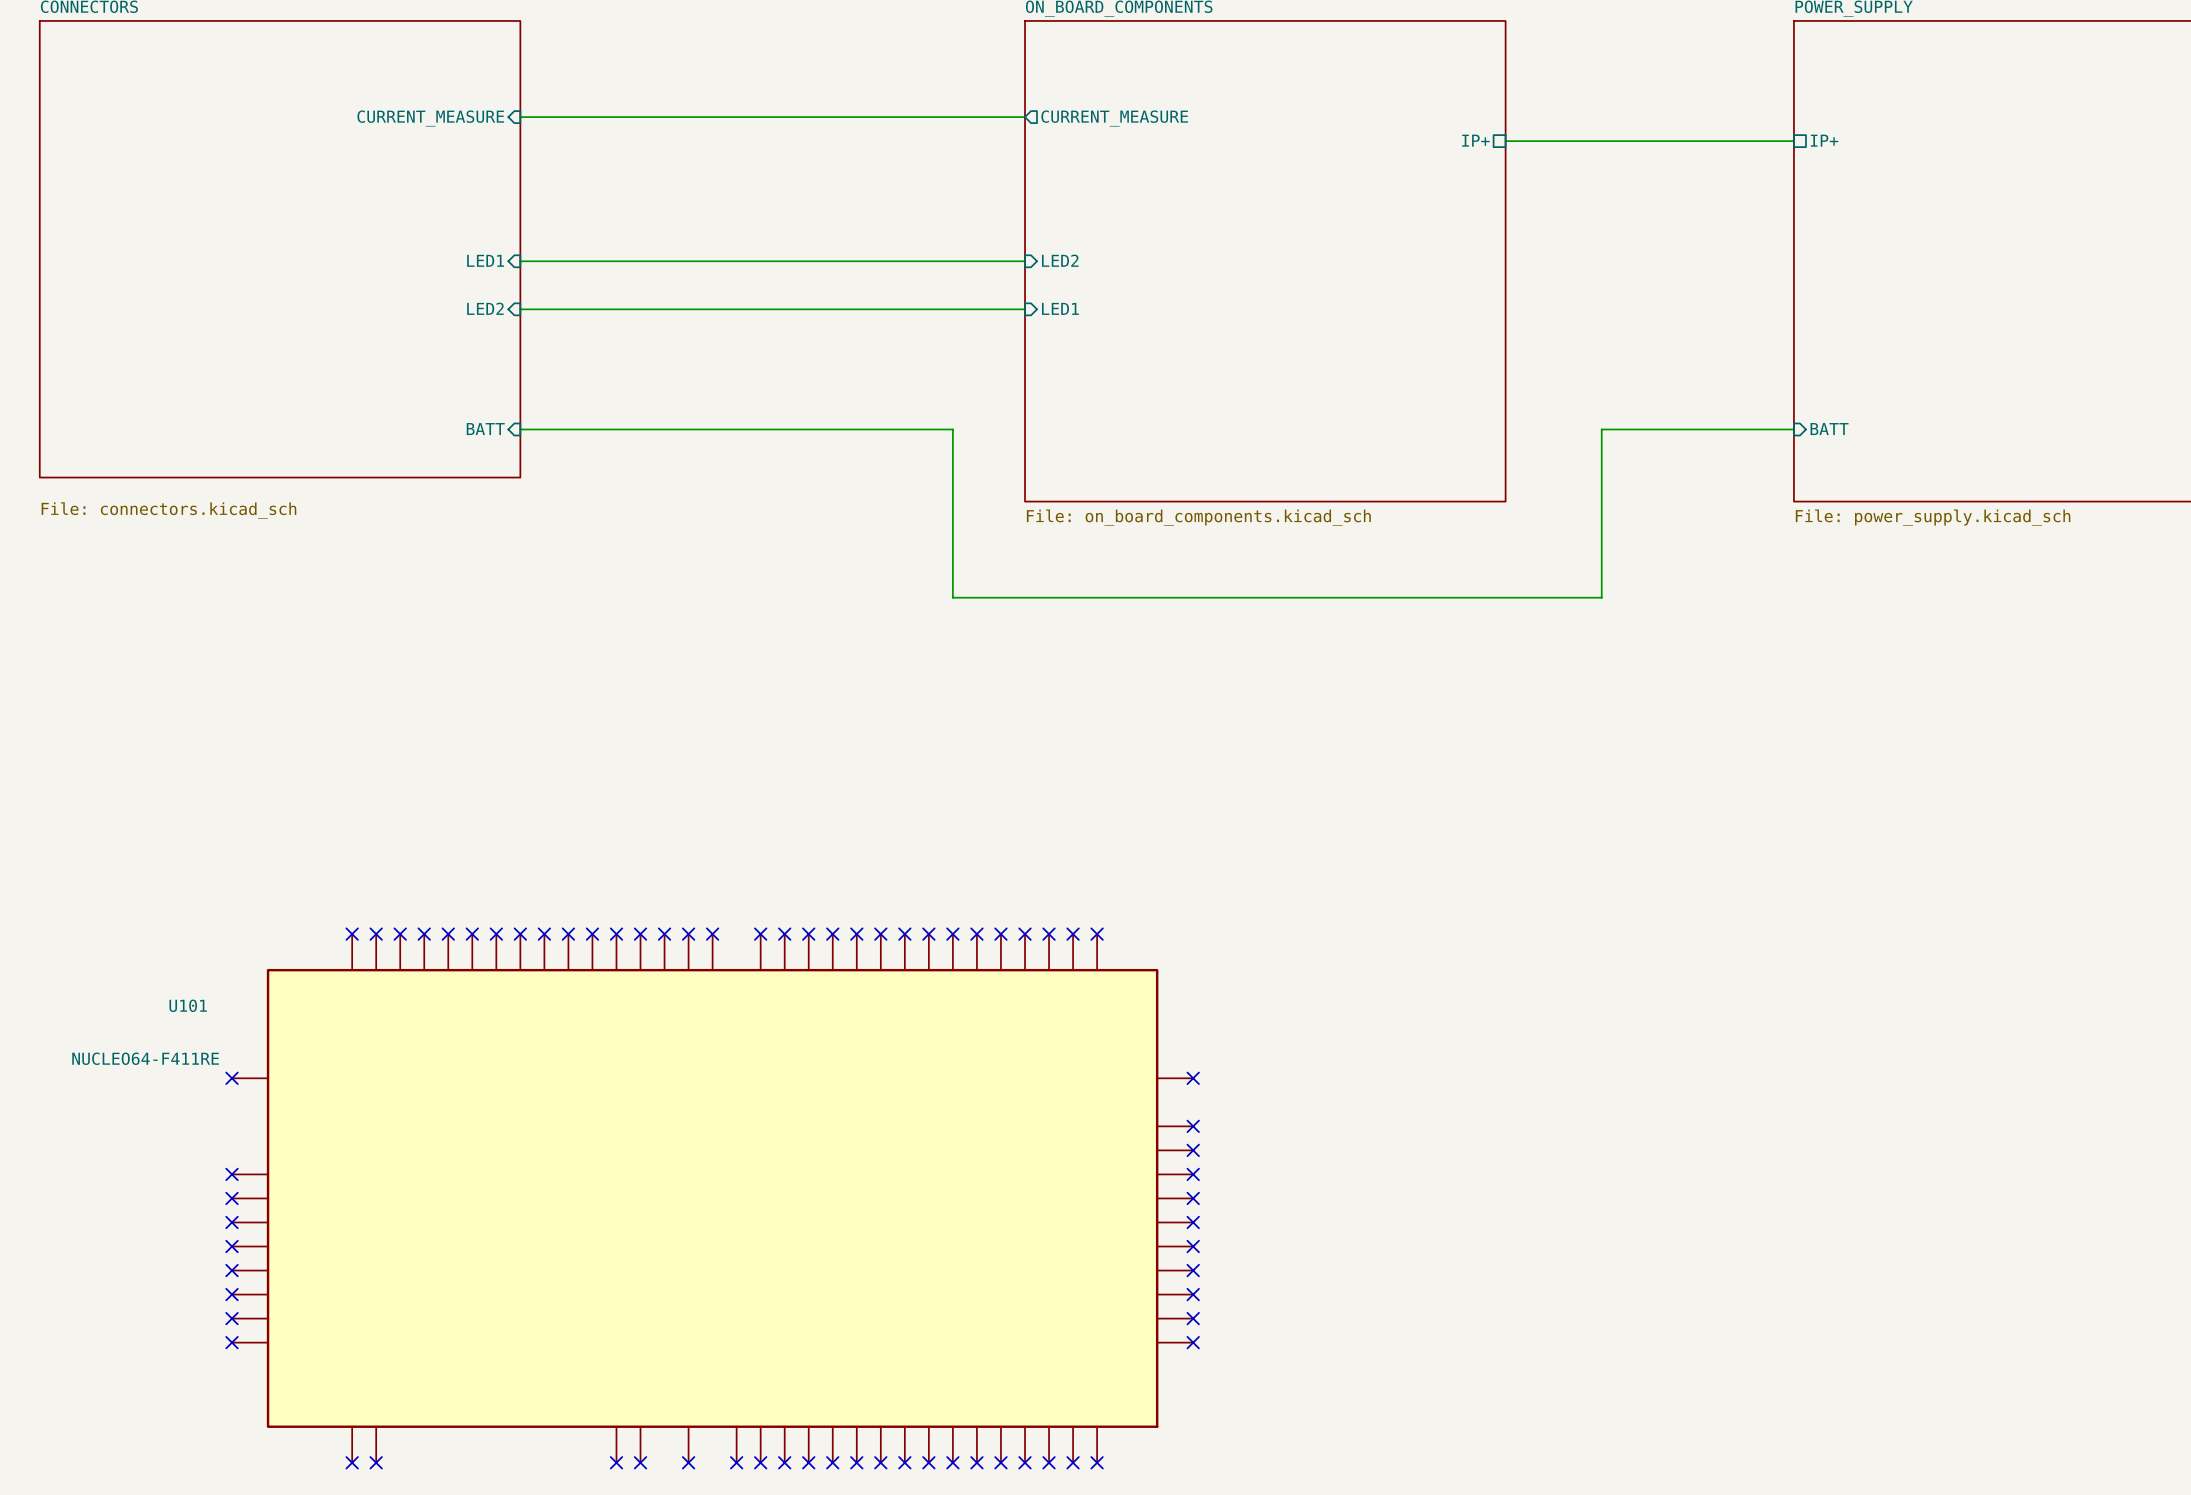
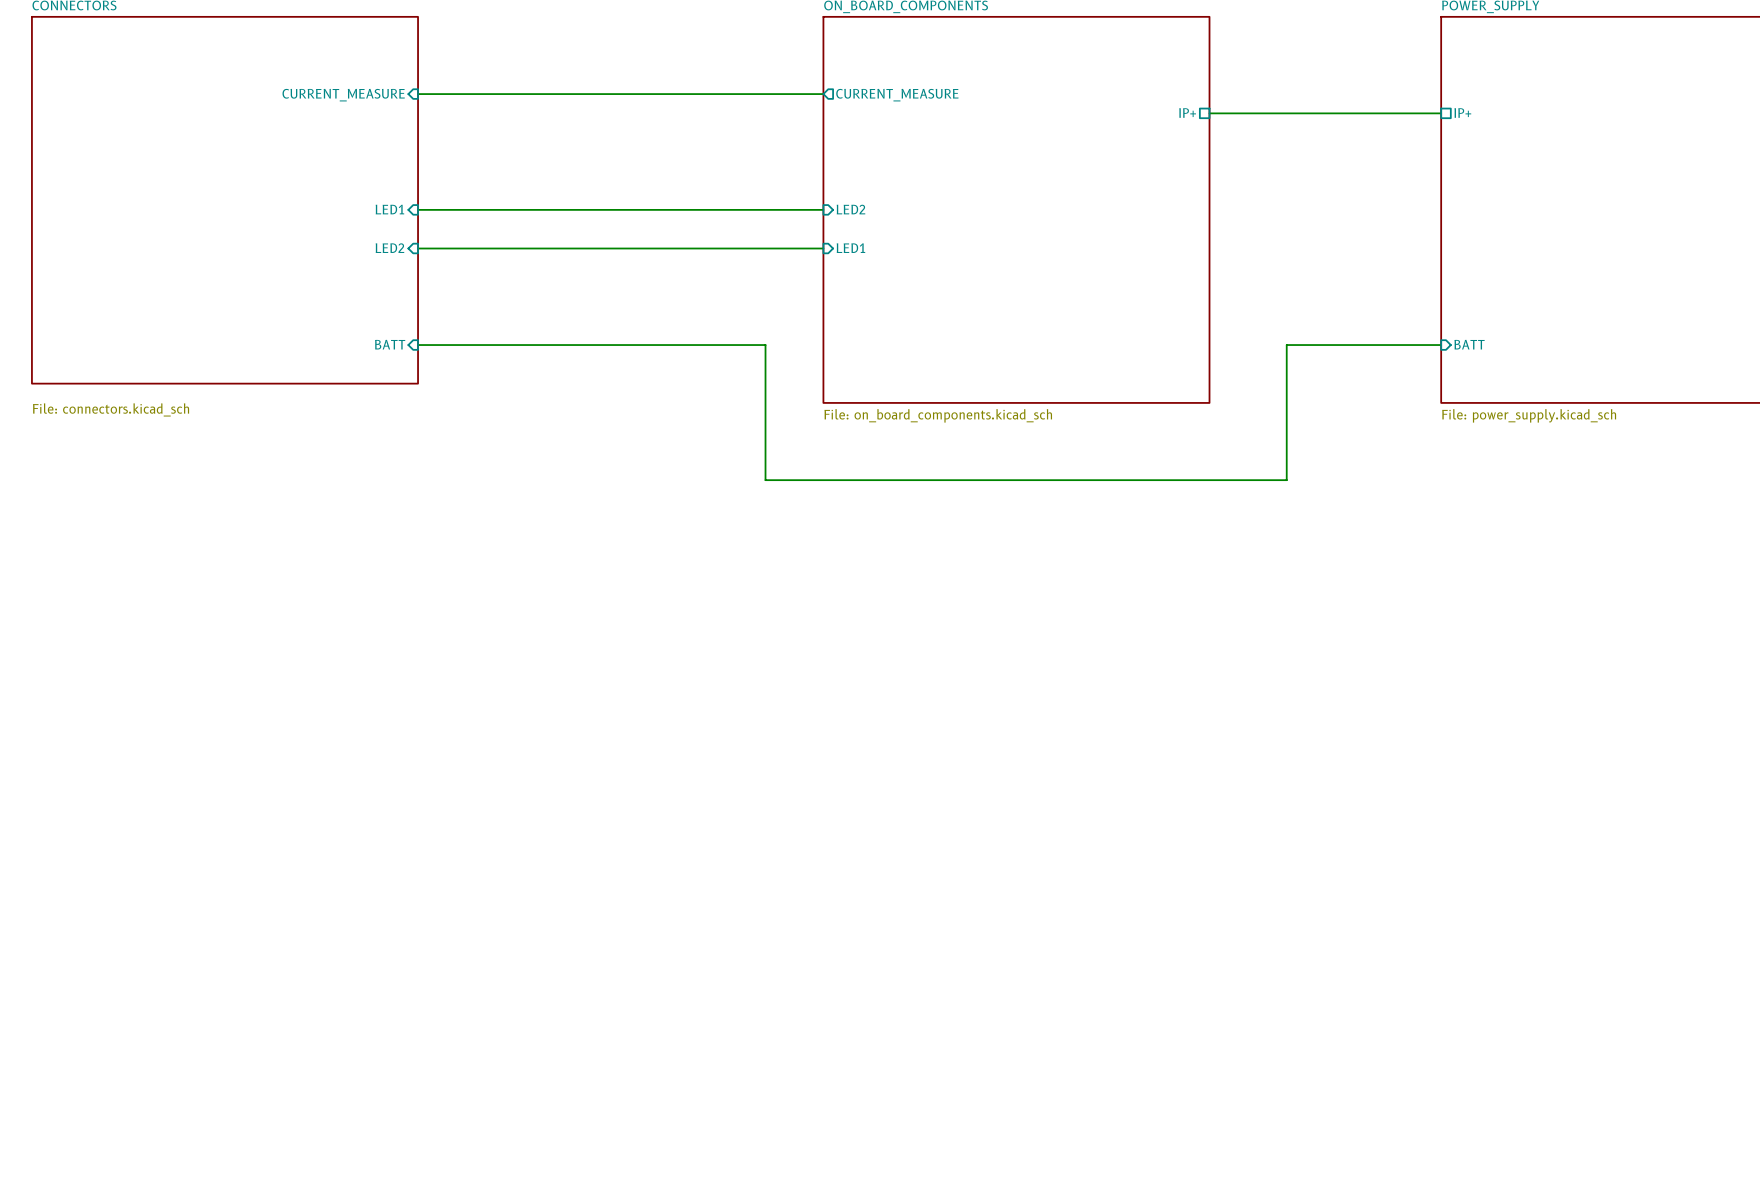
no-connect mark: (352, 934) -> none
no-connect mark: (376, 934) -> none
no-connect mark: (400, 934) -> none
no-connect mark: (424, 934) -> none
no-connect mark: (448, 934) -> none
no-connect mark: (472, 934) -> none
no-connect mark: (496, 934) -> none
no-connect mark: (520, 934) -> none
no-connect mark: (544, 934) -> none
no-connect mark: (568, 934) -> none
no-connect mark: (592, 934) -> none
no-connect mark: (616, 934) -> none
no-connect mark: (640, 934) -> none
no-connect mark: (664, 934) -> none
no-connect mark: (688, 934) -> none
no-connect mark: (712, 934) -> none
no-connect mark: (760, 934) -> none
no-connect mark: (784, 934) -> none
no-connect mark: (808, 934) -> none
no-connect mark: (832, 934) -> none
no-connect mark: (856, 934) -> none
no-connect mark: (880, 934) -> none
no-connect mark: (904, 934) -> none
no-connect mark: (928, 934) -> none
no-connect mark: (952, 934) -> none
no-connect mark: (976, 934) -> none
no-connect mark: (1000, 934) -> none
no-connect mark: (1025, 934) -> none
no-connect mark: (1049, 934) -> none
no-connect mark: (1073, 934) -> none
no-connect mark: (1097, 934) -> none
no-connect mark: (232, 1078) -> none
no-connect mark: (1193, 1078) -> none
no-connect mark: (1193, 1126) -> none
no-connect mark: (1193, 1150) -> none
no-connect mark: (232, 1174) -> none
no-connect mark: (1193, 1174) -> none
no-connect mark: (232, 1198) -> none
U101: NUCLEO64-F411RE (712, 1198) -> none
no-connect mark: (1193, 1198) -> none
no-connect mark: (232, 1222) -> none
no-connect mark: (1193, 1222) -> none
no-connect mark: (232, 1246) -> none
no-connect mark: (1193, 1246) -> none
no-connect mark: (232, 1270) -> none
no-connect mark: (1193, 1270) -> none
no-connect mark: (232, 1294) -> none
no-connect mark: (1193, 1294) -> none
no-connect mark: (232, 1318) -> none
no-connect mark: (1193, 1318) -> none
no-connect mark: (232, 1342) -> none
no-connect mark: (1193, 1342) -> none
no-connect mark: (352, 1462) -> none
no-connect mark: (376, 1462) -> none
no-connect mark: (616, 1462) -> none
no-connect mark: (640, 1462) -> none
no-connect mark: (688, 1462) -> none
no-connect mark: (736, 1462) -> none
no-connect mark: (760, 1462) -> none
no-connect mark: (784, 1462) -> none
no-connect mark: (808, 1462) -> none
no-connect mark: (832, 1462) -> none
no-connect mark: (856, 1462) -> none
no-connect mark: (880, 1462) -> none
no-connect mark: (904, 1462) -> none
no-connect mark: (928, 1462) -> none
no-connect mark: (952, 1462) -> none
no-connect mark: (976, 1462) -> none
no-connect mark: (1000, 1462) -> none
no-connect mark: (1025, 1462) -> none
no-connect mark: (1049, 1462) -> none
no-connect mark: (1073, 1462) -> none
no-connect mark: (1097, 1462) -> none

